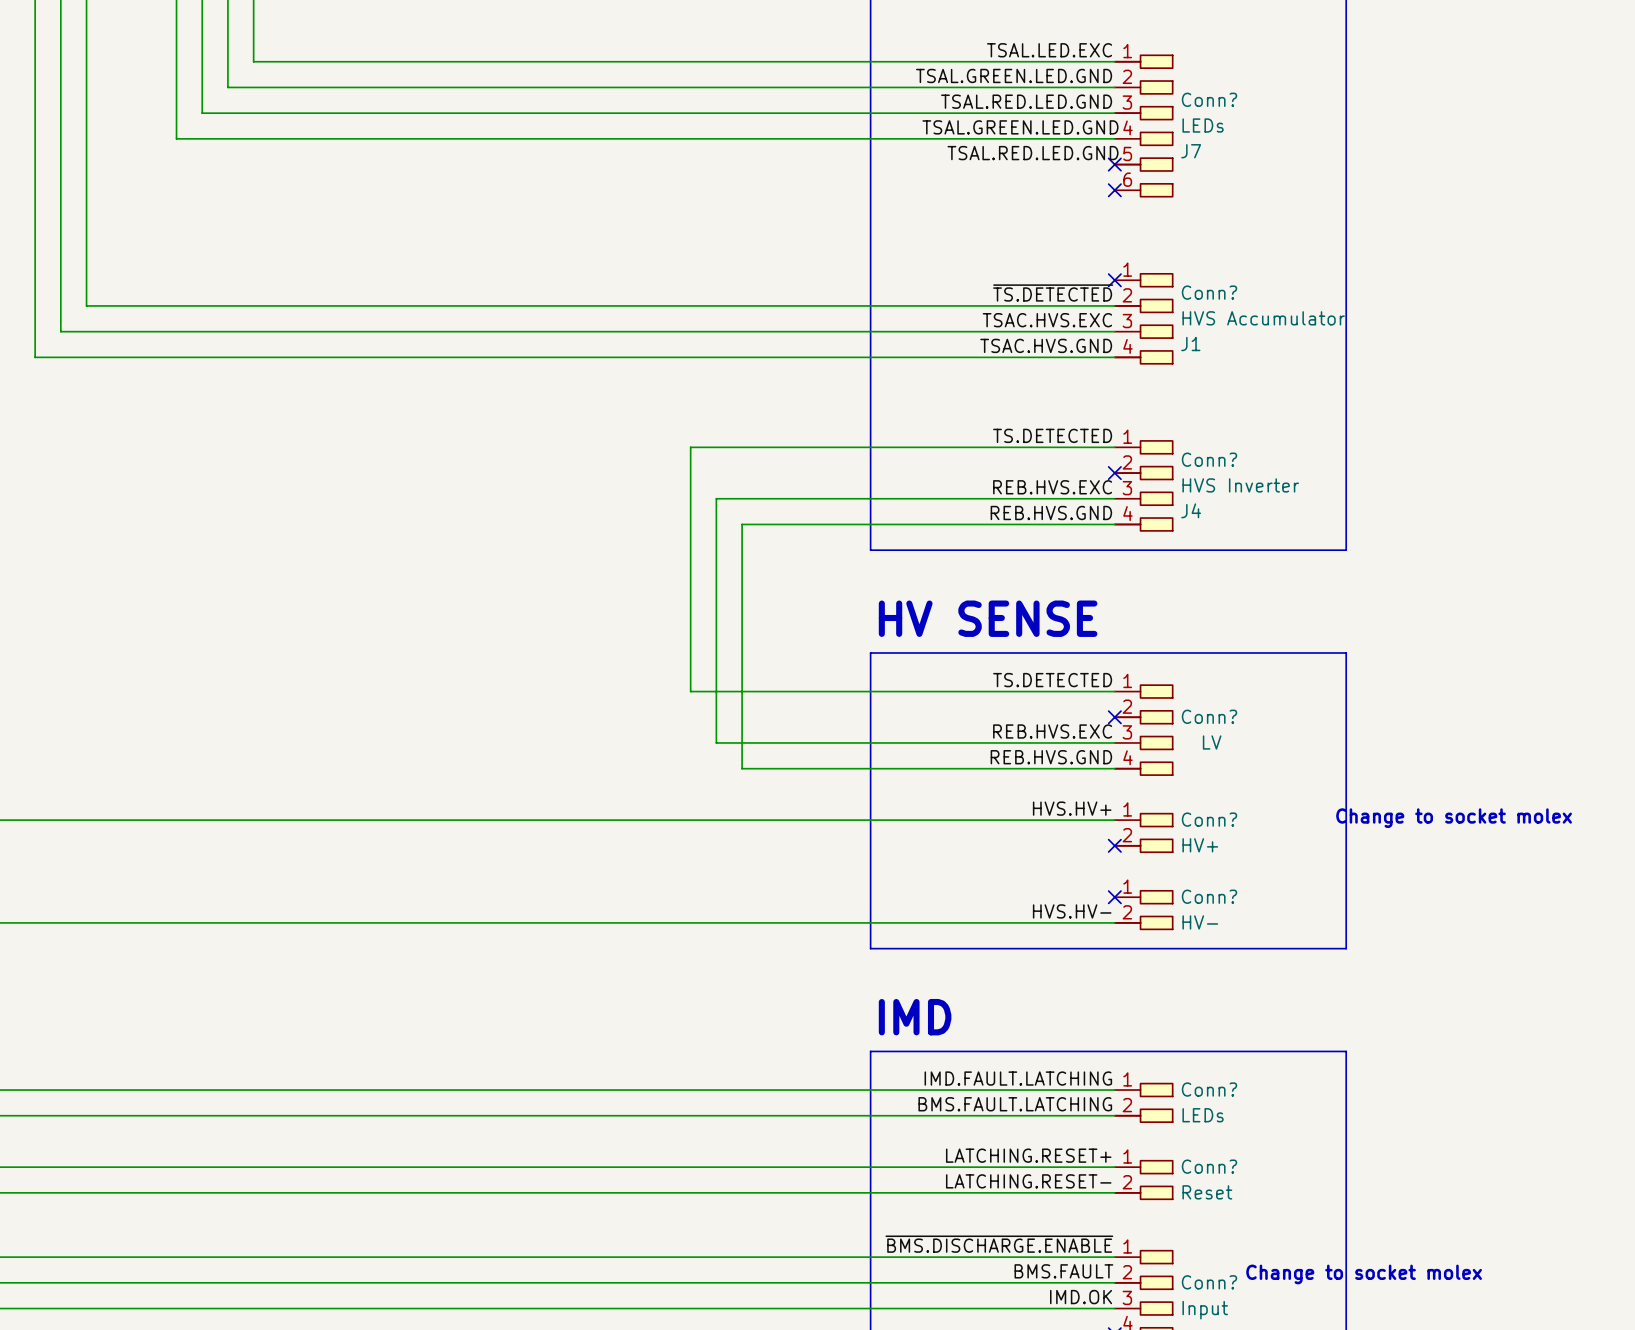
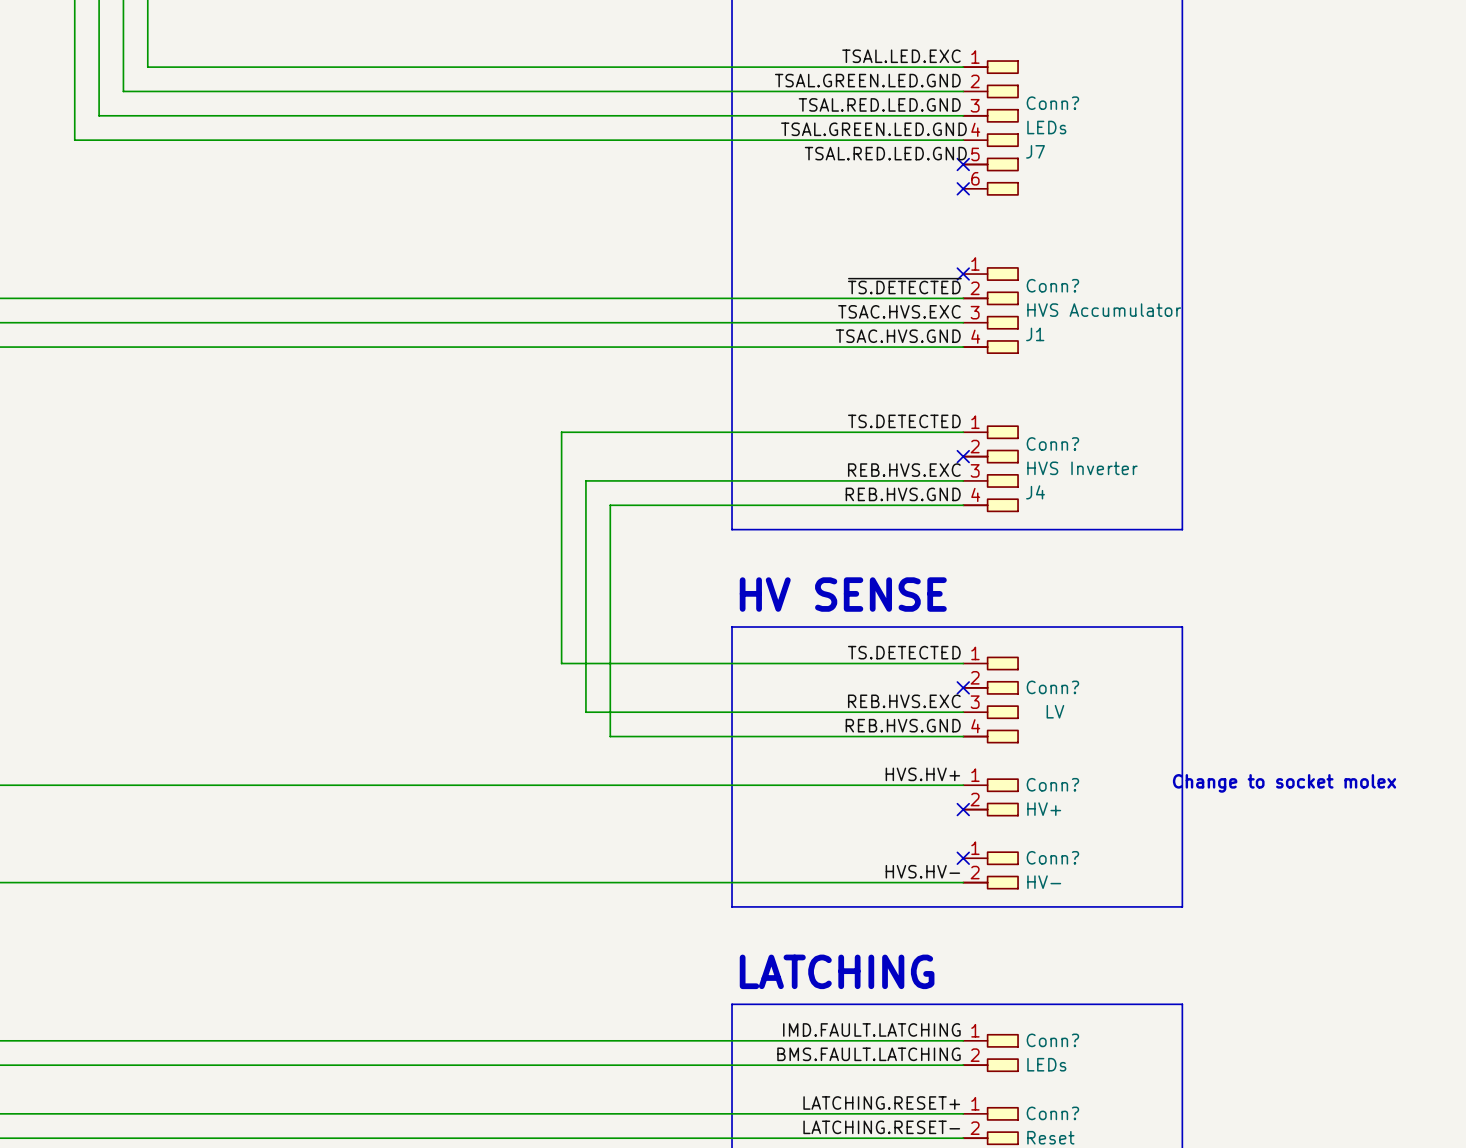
text: IMD (915, 1017) -> LATCHING (837, 971)

